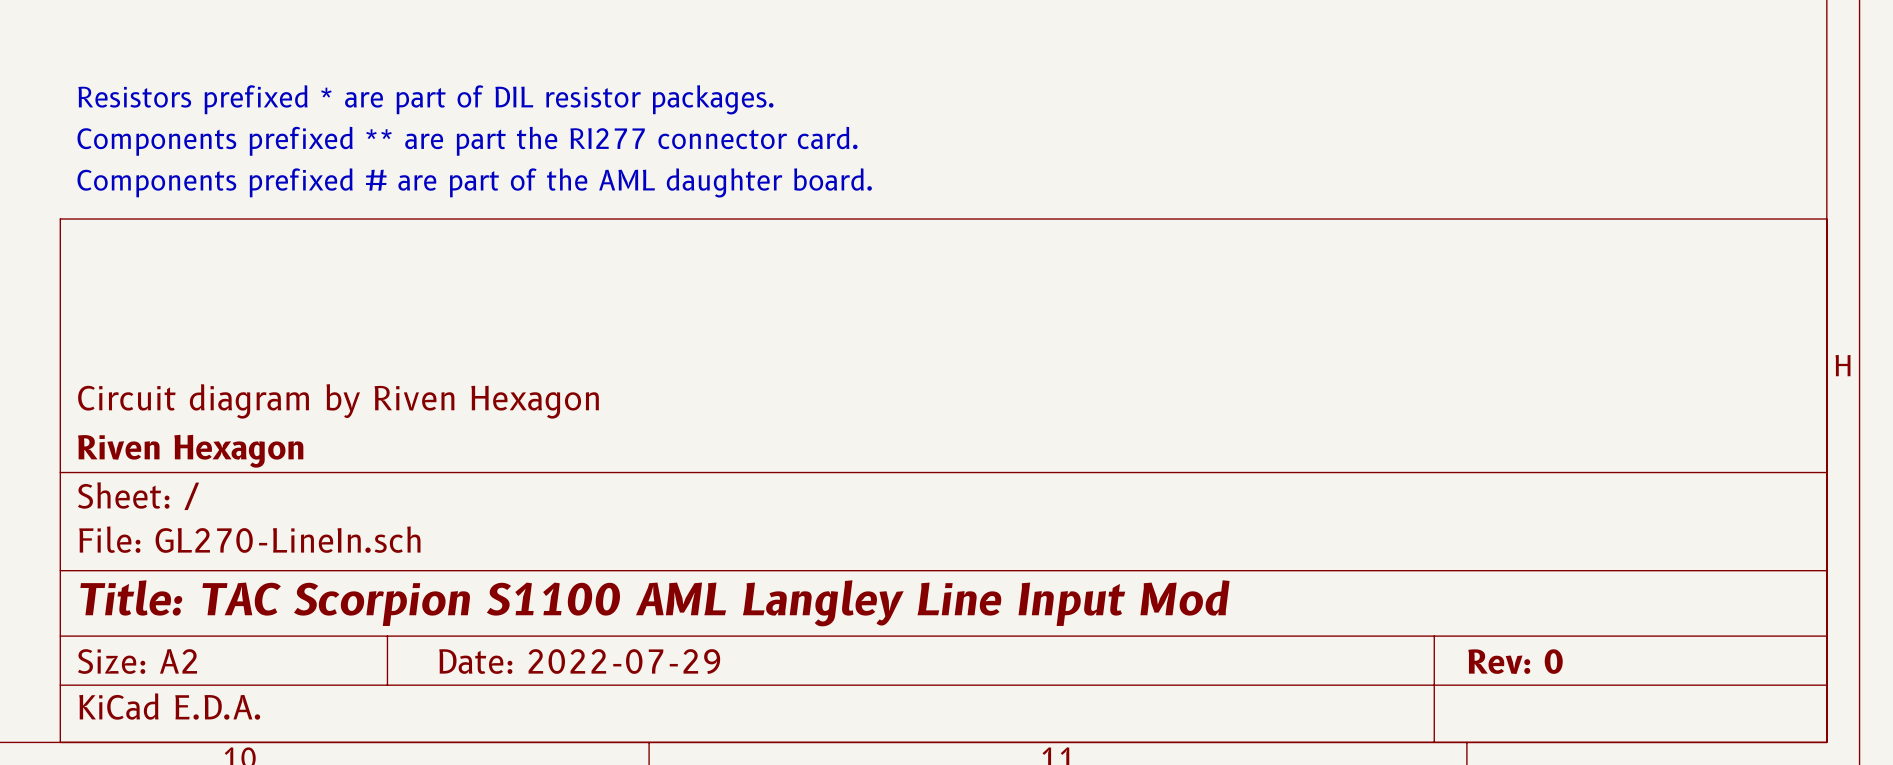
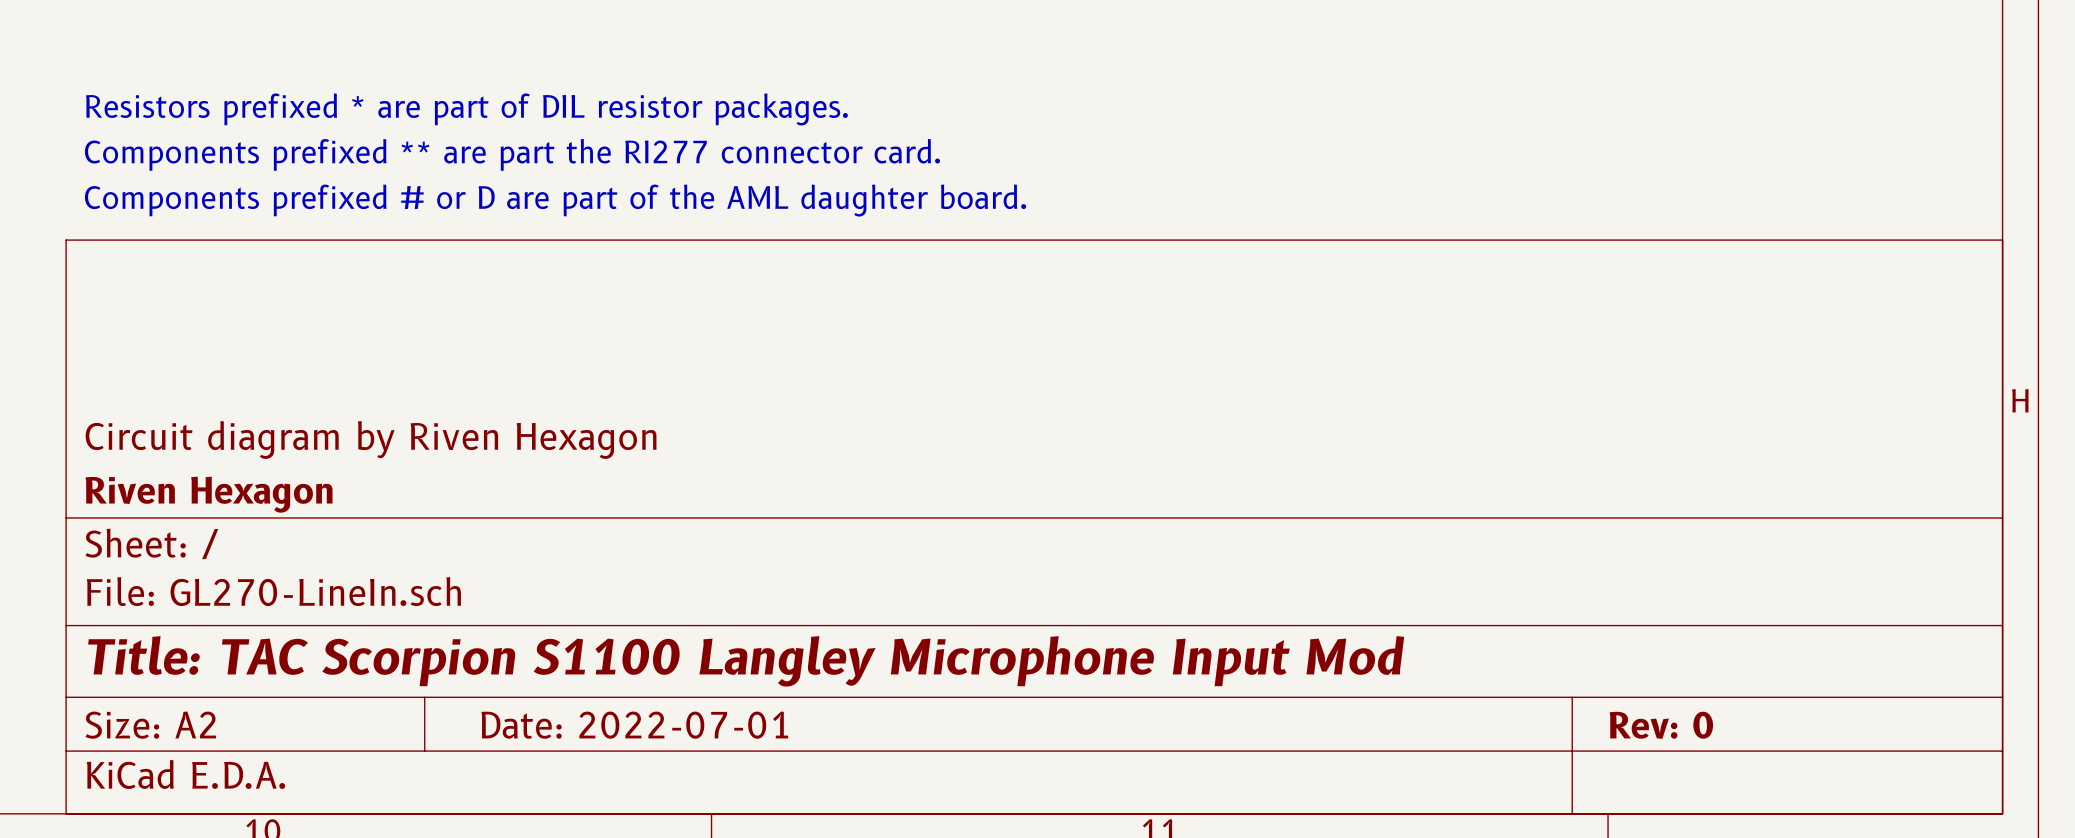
text: Components prefixed # are part of the AML daughter board. (474, 182) -> Components prefixed # or D are part of the AML daughter board. (555, 200)
title block: Title: TAC Scorpion S1100 AML Langley Line Input Mod (654, 603) -> Title: TAC Scorpion S1100 Langley Microphone Input Mod (746, 661)
title block: Date: 2022-07-29 (579, 661) -> Date: 2022-07-01 (634, 725)

